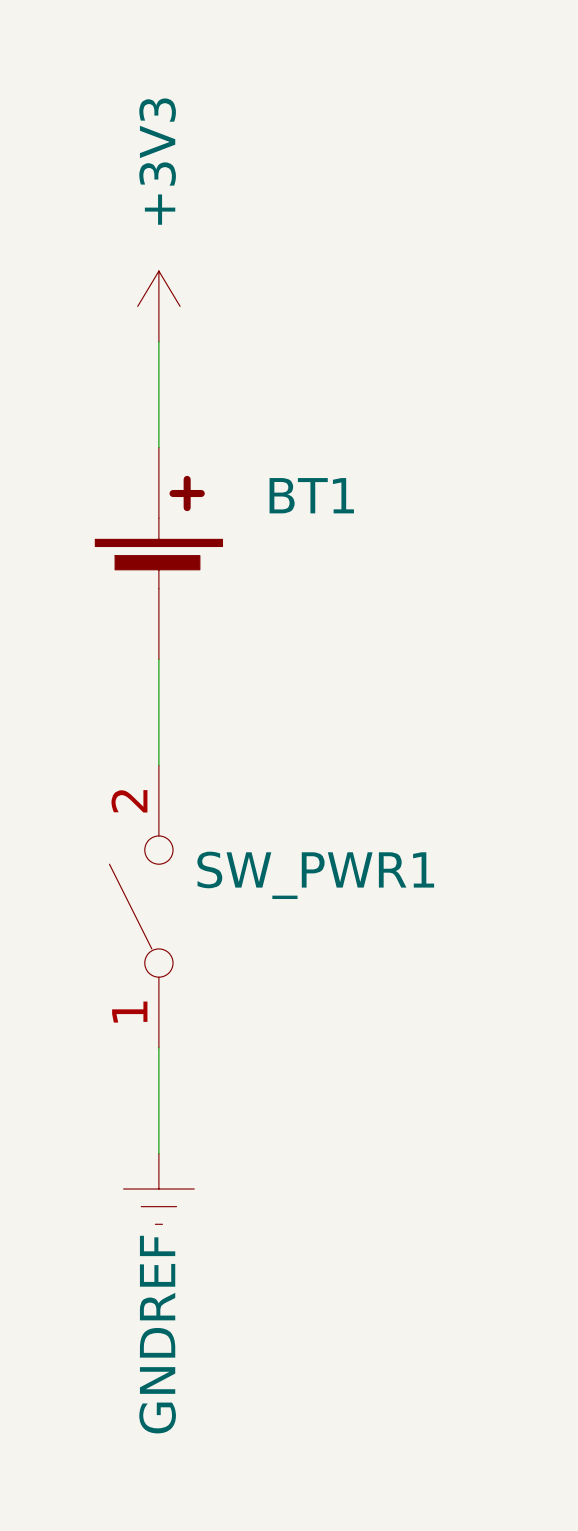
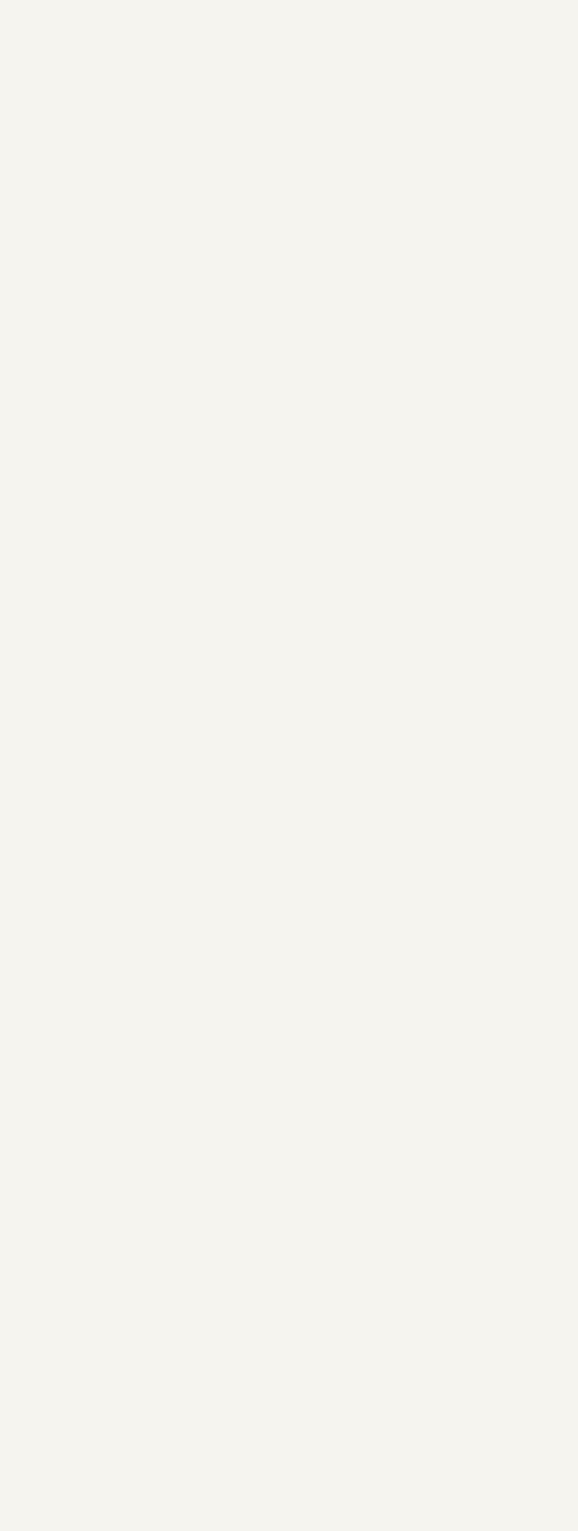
power symbol: +3V3 (158, 306) -> none
wire: (158, 341) (158, 447) -> none
BT1: (158, 553) -> none
wire: (158, 659) (158, 765) -> none
SW_PWR1: (141, 906) -> none
wire: (158, 1047) (158, 1153) -> none
power symbol: GNDREF (158, 1189) -> none

